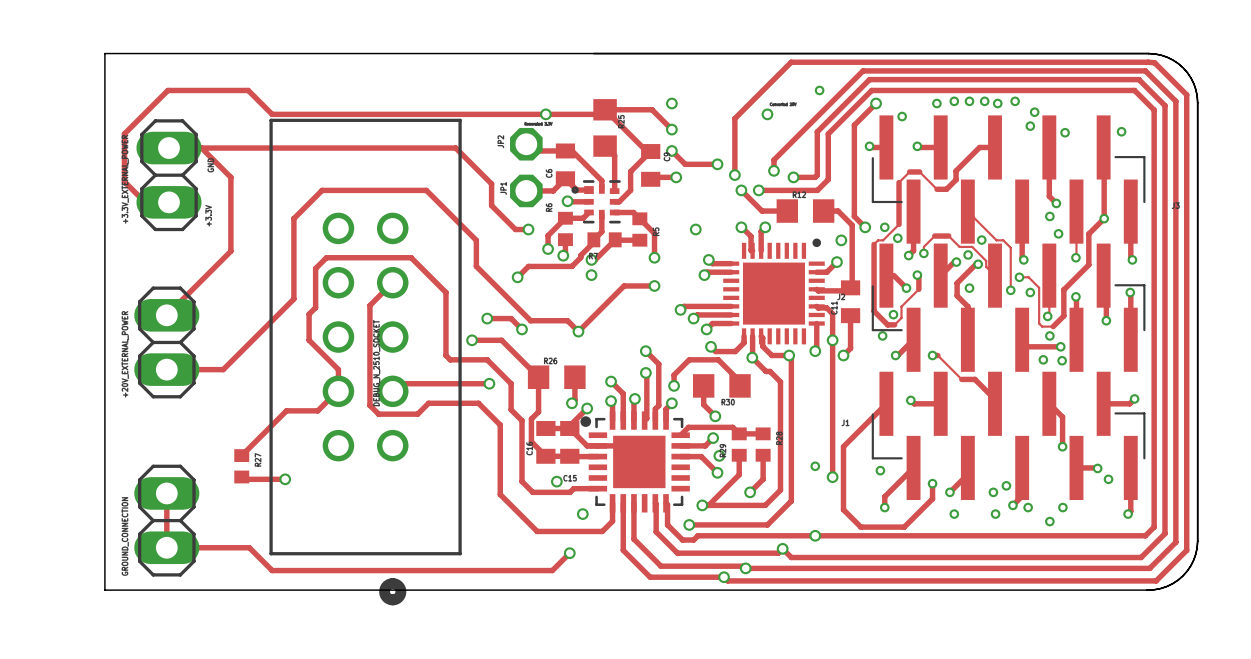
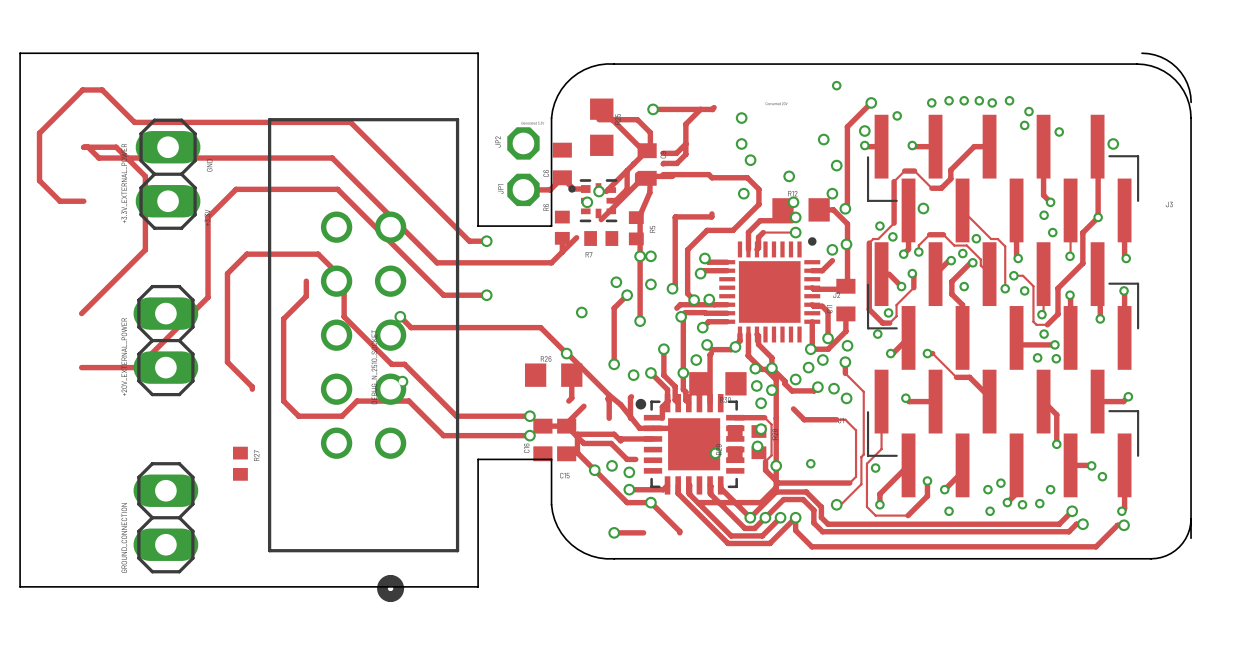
board edge: (104, 53) (104, 590) -> (104, 53) (20, 53) (20, 586) (104, 586)
board edge: (480, 53) (1155, 53) (1167, 57) (1178, 63) (1191, 77) (1197, 96) (1197, 118) -> (478, 53) (478, 226) (551, 226) (551, 118) (554, 103) (561, 89) (571, 78) (584, 69) (598, 64) (1144, 64) (1157, 68) (1175, 79) (1186, 97) (1191, 118)
via position: (819, 90) -> (836, 85)
via: (671, 103) -> none
track: none -> (714, 107) (712, 109) (653, 109)
via: none -> (653, 109)
track: none -> (700, 109) (685, 124) (685, 154) (676, 163) (663, 163)
via: (545, 114) -> none
via: (767, 114) -> none
via: none -> (741, 118)
track: none -> (599, 119) (637, 119) (650, 132) (650, 151)
track: (854, 125) (854, 216) (865, 227) -> (849, 124) (847, 126) (847, 206) (845, 208)
track: (671, 129) (652, 109) (605, 109) (600, 114) (272, 114) (248, 90) (167, 90) (124, 133) (124, 181) (145, 202) (168, 202) -> none
via: (671, 129) -> none
via: none -> (864, 131)
via: (1121, 131) -> none
via: none -> (823, 139)
track: (526, 144) (533, 150) (572, 150) (601, 180) (601, 188) -> none
track: none -> (685, 143) (676, 153) (663, 153)
via: none -> (741, 143)
via: none -> (1113, 143)
track: (605, 146) (614, 155) (614, 191) -> none
track: none -> (83, 147) (116, 147) (145, 176) (145, 249) (81, 313)
track: none -> (88, 147) (98, 158) (332, 158) (437, 262) (551, 262) (560, 254)
track: (168, 148) (455, 148) (491, 183) (491, 205) (515, 229) (528, 229) -> none
track: (201, 148) (230, 177) (230, 251) (166, 315) -> none
track: (671, 150) (685, 164) (717, 164) -> none
via: (671, 150) -> none
via: none -> (750, 160)
via: (717, 164) -> none
via: none -> (836, 165)
track: (773, 170) (773, 159) (863, 70) (1145, 70) (1175, 101) (1175, 542) (1149, 568) (745, 568) (743, 566) (661, 566) (633, 539) (633, 503) -> none
via: (773, 170) -> none
track: none -> (637, 174) (637, 183) (601, 219)
track: none -> (663, 174) (708, 174) (711, 177) (747, 177) (758, 189) (758, 204) (733, 230) (707, 230) (687, 249) (687, 293) (694, 300)
track: (734, 175) (734, 118) (791, 62) (1154, 62) (1186, 94) (1186, 550) (1156, 580) (727, 580) (724, 577) (650, 577) (623, 550) (623, 503) -> none
via: (734, 175) -> none
track: none -> (650, 176) (649, 192) (639, 216) (640, 321)
via: (676, 177) -> none
track: (793, 177) (815, 177) (817, 175) (817, 131) (869, 79) (1138, 79) (1165, 105) (1165, 533) (1141, 557) (791, 557) (782, 548) (778, 553) (677, 553) (656, 531) (655, 503) -> none
track: (322, 190) (293, 218) (293, 299) (223, 369) (166, 369) -> (320, 189) (236, 189) (208, 217) (208, 297) (137, 367) (81, 367)
track: (339, 190) (426, 190) (476, 240) (476, 266) (530, 320) (567, 320) (578, 331) (624, 285) (654, 285) -> (337, 189) (443, 295) (486, 295)
track: (741, 190) (762, 211) (787, 211) -> none
via: (741, 190) -> none
track: (758, 190) (817, 190) (828, 179) (828, 133) (871, 90) (1134, 90) (1154, 110) (1154, 527) (1145, 535) (697, 535) (693, 540) (682, 540) (667, 524) (666, 503) -> none
via: (758, 190) -> none
via: none -> (599, 191)
via: none -> (743, 193)
via: none -> (832, 193)
track: (567, 201) (589, 201) -> none
via: (567, 201) -> none
track: none -> (83, 201) (60, 201) (39, 180) (39, 133) (82, 89) (102, 89) (134, 122) (350, 122) (469, 241) (486, 241)
via: none -> (587, 202)
via: none -> (793, 202)
via: none -> (845, 208)
via: none -> (923, 208)
track: (589, 212) (583, 218) (565, 218) (548, 235) (548, 249) -> none
track: (614, 212) (633, 212) (654, 233) (654, 257) -> none
track: (601, 214) (601, 231) (571, 266) (528, 266) (517, 277) -> none
track: none -> (711, 213) (711, 216) (675, 216) (675, 286) (672, 288)
via: none -> (795, 217)
track: (741, 227) (751, 236) (752, 250) -> (795, 217) (792, 220) (760, 220) (748, 232) (748, 249)
via: (741, 227) -> none
track: (765, 227) (761, 231) (761, 250) -> (795, 232) (763, 232) (758, 237) (756, 249)
via: (765, 227) -> none
via: (865, 227) -> none
via: (528, 229) -> none
via: (695, 229) -> none
via: none -> (795, 232)
track: (639, 240) (615, 239) (595, 259) (591, 259) -> none
via: (841, 240) -> none
via: none -> (486, 241)
via: none -> (846, 244)
via: (548, 249) -> none
via: none -> (832, 249)
via: (563, 255) -> none
via: none -> (640, 256)
via: (591, 259) -> none
via: (836, 262) -> none
via: (591, 275) -> none
via: (517, 277) -> none
track: none -> (306, 281) (306, 296) (283, 318) (283, 401) (298, 416) (341, 416) (357, 401) (408, 401) (443, 435) (529, 435)
track: (392, 282) (369, 305) (369, 405) (378, 414) (417, 414) (428, 403) (478, 403) (500, 425) (500, 494) (537, 531) (602, 531) (612, 521) (612, 503) -> none
via: none -> (616, 282)
via: none -> (672, 288)
via: none -> (486, 295)
track: none -> (627, 295) (614, 308) (614, 364)
via: none -> (627, 295)
via: none -> (694, 300)
via: none -> (709, 299)
via: (680, 309) -> none
via: none -> (581, 312)
track: (709, 314) (697, 314) (693, 318) -> (705, 313) (685, 312) (681, 316) (683, 318) (683, 389) (685, 392) (685, 400) (688, 403)
track: none -> (400, 316) (411, 327) (540, 327) (620, 404) (639, 428) (669, 428) (685, 444) (694, 444)
via: none -> (400, 316)
track: (487, 318) (511, 318) (521, 329) -> none
via: (487, 318) -> none
via: none -> (681, 316)
via: (693, 318) -> none
via: none -> (640, 321)
via: (521, 329) -> none
via: (578, 331) -> none
track: (850, 333) (850, 348) (843, 355) -> (845, 331) (828, 349) (810, 349)
track: (832, 335) (832, 477) -> none
track: (472, 340) (501, 340) (538, 377) (538, 411) (531, 419) (531, 441) (545, 456) (597, 456) -> none
via: (472, 340) -> none
via: none -> (847, 345)
via: none -> (735, 346)
track: (645, 351) (658, 364) (658, 405) (655, 409) (655, 420) -> none
via: (645, 351) -> none
track: none -> (663, 349) (663, 375) (675, 386) (675, 400) (678, 403)
via: none -> (663, 349)
via: none -> (566, 353)
track: none -> (711, 353) (710, 403)
track: (771, 355) (789, 355) (791, 357) (791, 501) (767, 524) (689, 524) -> (767, 353) (771, 357) (771, 368) (792, 390) (814, 390) (817, 387)
via: (789, 355) -> none
via: (843, 355) -> none
via: (752, 357) -> none
via: none -> (696, 360)
via: none -> (822, 360)
track: none -> (845, 362) (845, 373) (863, 391) (863, 454) (861, 457) (861, 484) (840, 504) (836, 504)
via: none -> (845, 362)
via: none -> (614, 364)
via: none -> (808, 367)
via: none -> (755, 368)
via: none -> (771, 368)
track: (645, 372) (646, 418) (644, 420) -> none
via: (645, 372) -> none
track: none -> (650, 372) (667, 389) (667, 403)
via: none -> (650, 372)
via: none -> (683, 372)
via: none -> (633, 375)
track: (611, 381) (623, 393) (623, 420) -> none
via: (611, 381) -> none
via: none -> (795, 379)
track: (404, 383) (489, 383) -> none
via: none -> (402, 381)
via: (489, 383) -> none
track: (674, 385) (674, 375) (689, 359) (718, 359) (740, 381) (740, 385) -> none
via: (674, 385) -> none
track: (703, 385) (703, 404) (715, 416) -> none
via: none -> (756, 385)
via: none -> (817, 387)
track: (338, 390) (317, 410) (286, 410) (241, 455) -> none
via: none -> (834, 388)
track: none -> (252, 389) (227, 362) (227, 273) (246, 254) (318, 254) (344, 280) (344, 316) (391, 364) (404, 364) (456, 416) (529, 416)
track: (338, 391) (338, 369) (309, 340) (309, 314) (315, 307) (315, 268) (326, 257) (411, 257) (445, 292) (445, 355) (450, 359) (487, 359) (511, 383) (511, 409) (521, 420) (521, 481) (532, 492) (569, 492) (573, 488) (597, 488) -> none
via: none -> (771, 390)
via: (634, 398) -> none
via: none -> (846, 398)
via: (611, 401) -> none
via: (571, 403) -> none
via: (671, 403) -> none
track: (886, 403) (843, 446) (843, 509) (860, 527) -> (881, 401) (881, 449) (866, 463) (866, 506) (875, 515) (908, 515)
via: none -> (761, 403)
via: (587, 408) -> none
track: none -> (793, 408) (804, 419) (845, 419) (856, 430) (856, 476) (849, 483) (778, 483) (765, 470) (765, 461) (771, 455) (771, 424) (764, 417) (735, 417)
via: (715, 416) -> none
via: none -> (529, 416)
via: none -> (761, 429)
track: (763, 433) (739, 433) (732, 427) (688, 427) (680, 435) -> none
via: none -> (529, 435)
track: (713, 438) (705, 445) (680, 445) -> none
via: (713, 438) -> none
track: none -> (652, 438) (620, 438) (620, 440) (614, 434) (577, 434) (577, 452) (627, 502) (650, 502) (679, 532)
via: none -> (757, 446)
track: (739, 455) (739, 474) (708, 505) -> none
track: (763, 455) (763, 479) (750, 492) -> none
track: (680, 456) (701, 456) (717, 472) -> none
part position: (635, 461) -> (689, 444)
via: none -> (612, 465)
via: none -> (776, 465)
via: none -> (594, 470)
via: (717, 472) -> none
via: none -> (629, 472)
track: (241, 476) (244, 479) (285, 479) -> none
via: (832, 477) -> none
via: (285, 479) -> none
via: (556, 481) -> none
track: none -> (667, 485) (663, 489) (629, 489)
track: none -> (678, 485) (678, 493) (728, 543) (769, 543) (795, 517) (795, 530) (811, 546) (1096, 546) (1117, 525) (1124, 525)
track: none -> (688, 485) (689, 494) (731, 535) (762, 535) (780, 517)
track: none -> (710, 485) (710, 494) (744, 528) (754, 528) (783, 499) (803, 499) (813, 510) (813, 522) (822, 531) (1068, 531) (1076, 524) (1083, 524)
track: none -> (720, 485) (720, 488) (750, 517) (776, 492) (806, 492) (821, 507) (821, 517) (828, 524) (856, 524)
via: none -> (629, 489)
via: (750, 492) -> none
via: none -> (1050, 489)
track: (166, 493) (166, 547) (249, 547) (272, 570) (552, 570) (569, 553) -> none
via: none -> (650, 502)
via: (702, 505) -> none
via: none -> (1039, 503)
via: none -> (836, 504)
via: (1062, 507) -> none
via: (582, 514) -> none
via: none -> (1072, 511)
track: (913, 518) (904, 527) -> (1072, 511) (1059, 524) (899, 524)
via: none -> (750, 517)
via: none -> (765, 517)
via: none -> (780, 517)
via: none -> (795, 517)
via: (1049, 521) -> none
via: (689, 524) -> none
via: none -> (1083, 524)
via: none -> (1124, 525)
track: none -> (614, 532) (643, 532)
via: none -> (614, 532)
via: (815, 535) -> none
via: (782, 548) -> none
via: (569, 553) -> none
via: (745, 568) -> none
via: (724, 577) -> none
board edge: (480, 590) (1148, 590) (1155, 589) (1161, 588) (1167, 586) (1173, 583) (1178, 580) (1183, 575) (1187, 570) (1191, 565) (1193, 559) (1195, 553) (1197, 547) (1197, 541) (1193, 560) (1182, 576) (1166, 586) (1160, 588) (1153, 589) (1147, 590) -> (478, 586) (478, 459) (551, 459) (551, 504) (557, 526) (566, 539) (577, 549) (591, 556) (606, 558) (1156, 558) (1171, 553) (1179, 547) (1187, 534) (1191, 518)

